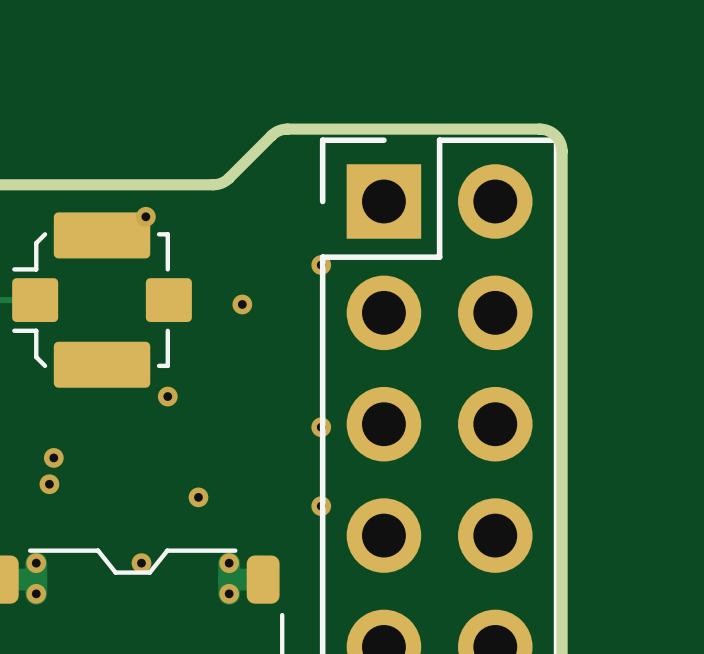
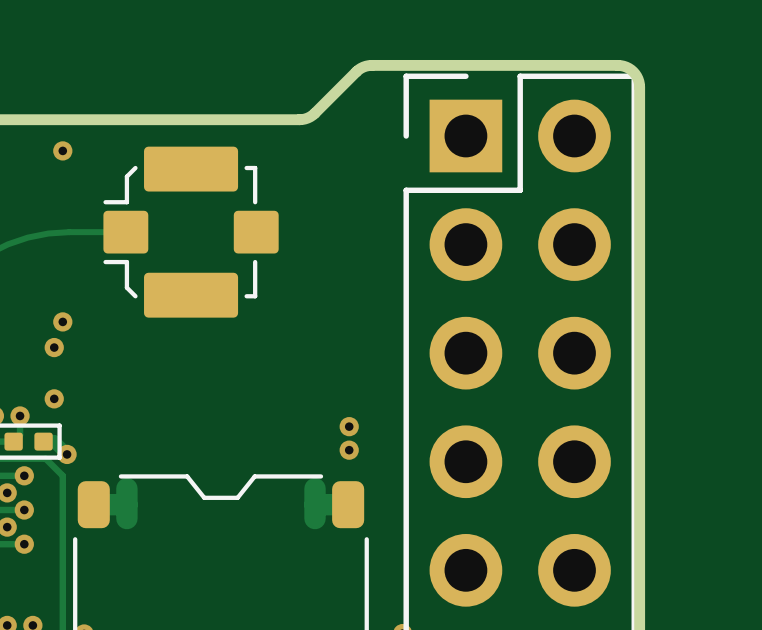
via: (145, 216) -> none
via: (321, 265) -> none
via: (242, 304) -> none
via: (167, 396) -> none
via: (321, 427) -> none
via: (53, 457) -> none
via: (49, 484) -> none
via: (198, 497) -> none
via: none -> (349, 426)
via: (321, 506) -> none
via: none -> (349, 450)
via: (36, 563) -> none
via: (141, 563) -> none
via: (229, 563) -> none
via: (36, 593) -> none
via: (229, 593) -> none

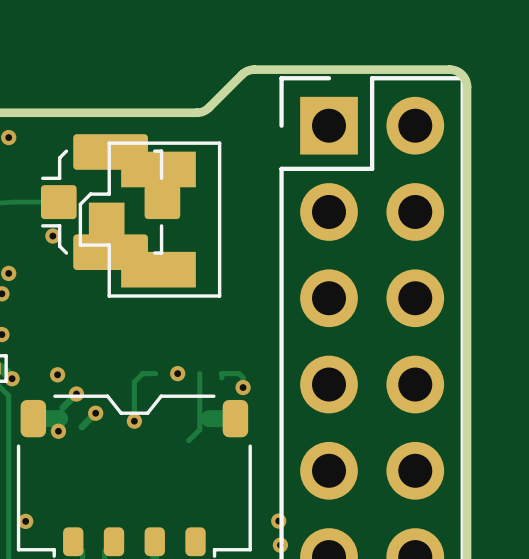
part: none -> (150, 219)
via: none -> (52, 236)
via: (349, 426) -> none
track: none -> (155, 373) (142, 373) (134, 382) (134, 421)
via: none -> (177, 373)
track: none -> (199, 373) (199, 429) (188, 440)
via: none -> (57, 374)
via position: (349, 450) -> (243, 387)
track: none -> (221, 377) (221, 373) (238, 373) (243, 377) (243, 387)
track: none -> (76, 394) (62, 407)
via: none -> (76, 394)
track: (126, 488) (126, 518) -> none
track: (315, 488) (315, 518) -> none
track: none -> (95, 413) (81, 427)
via: none -> (95, 413)
via: none -> (134, 421)
via: none -> (58, 431)

